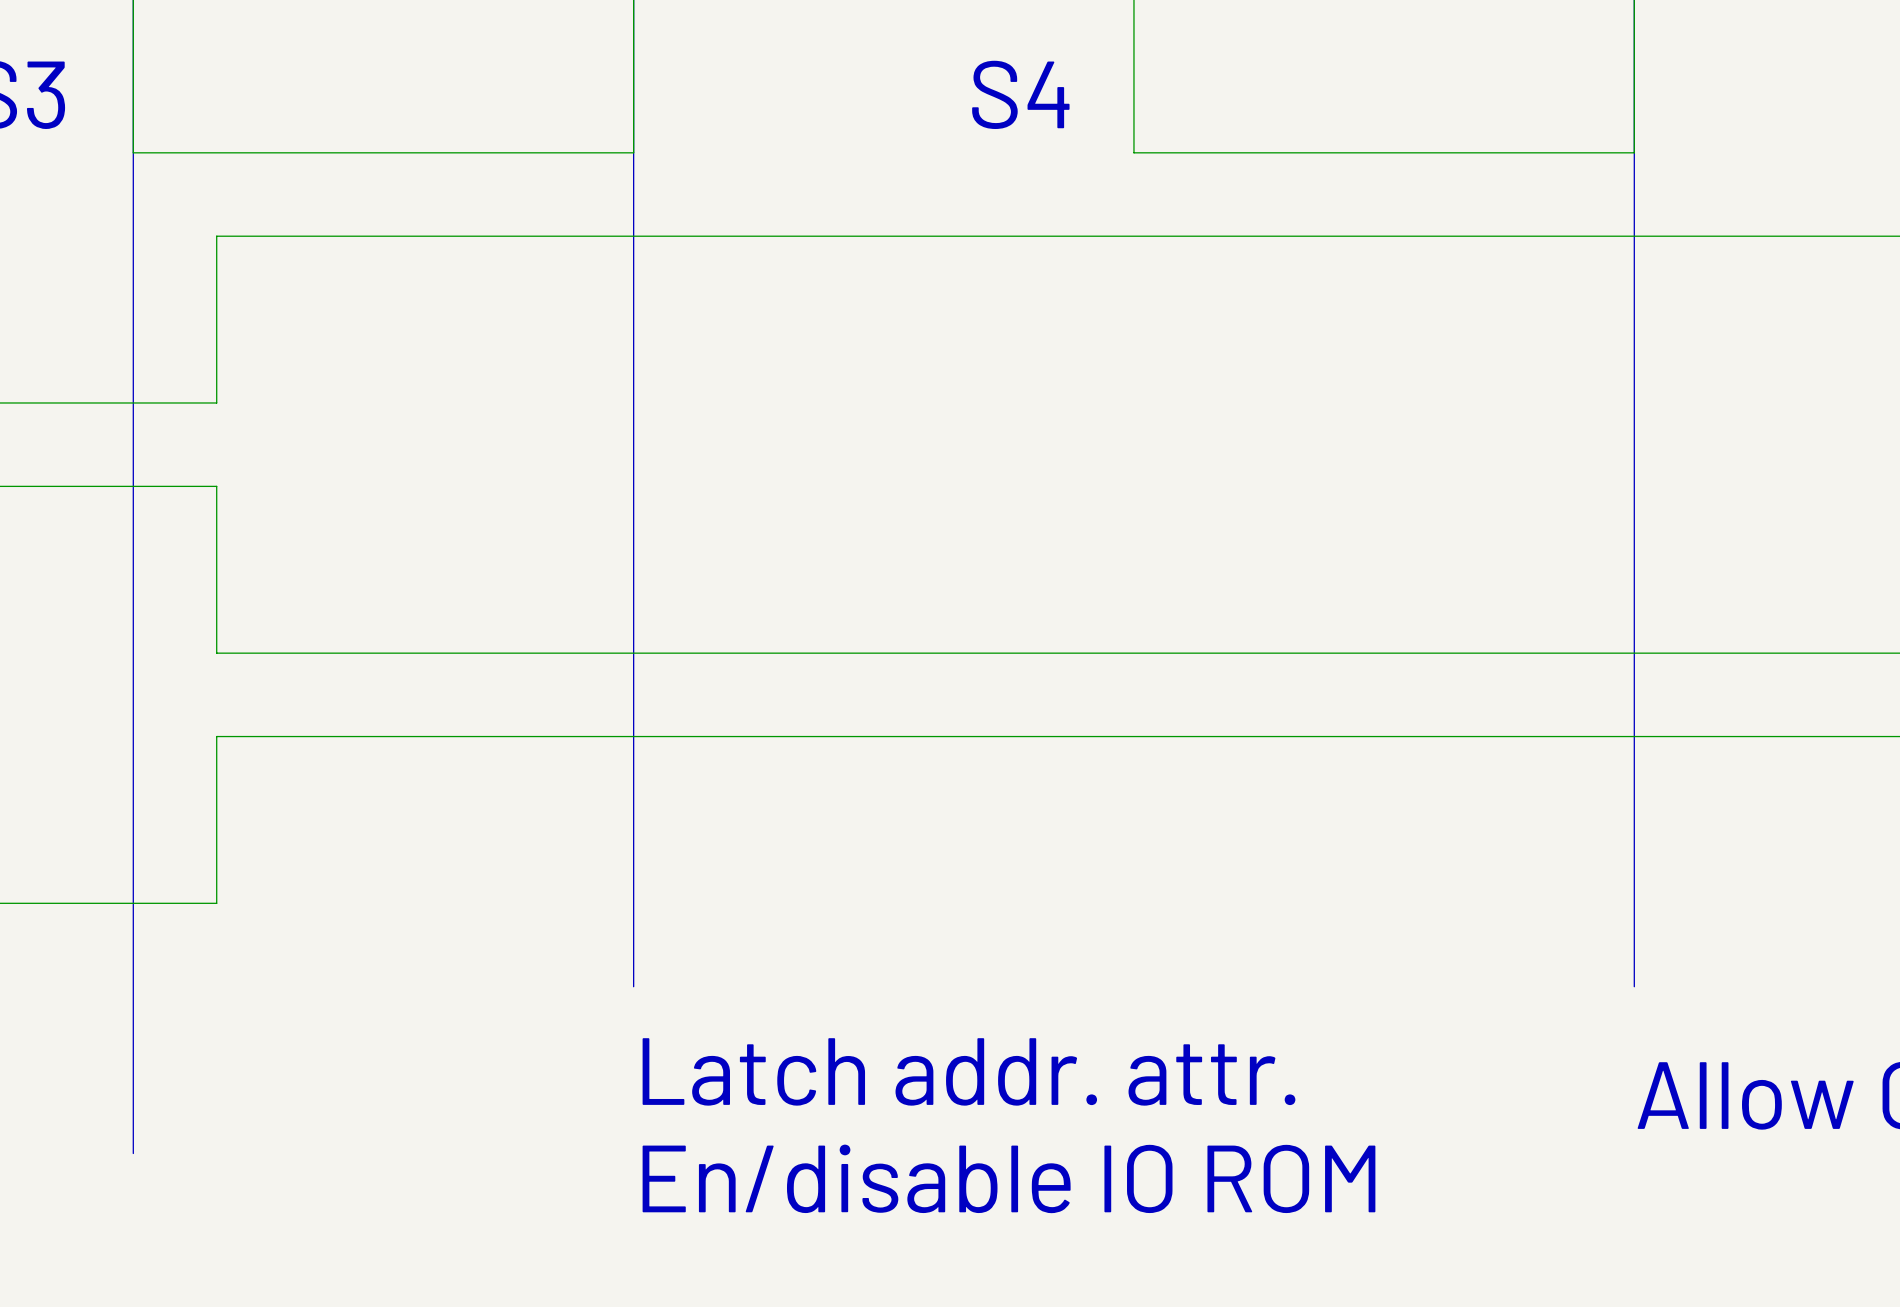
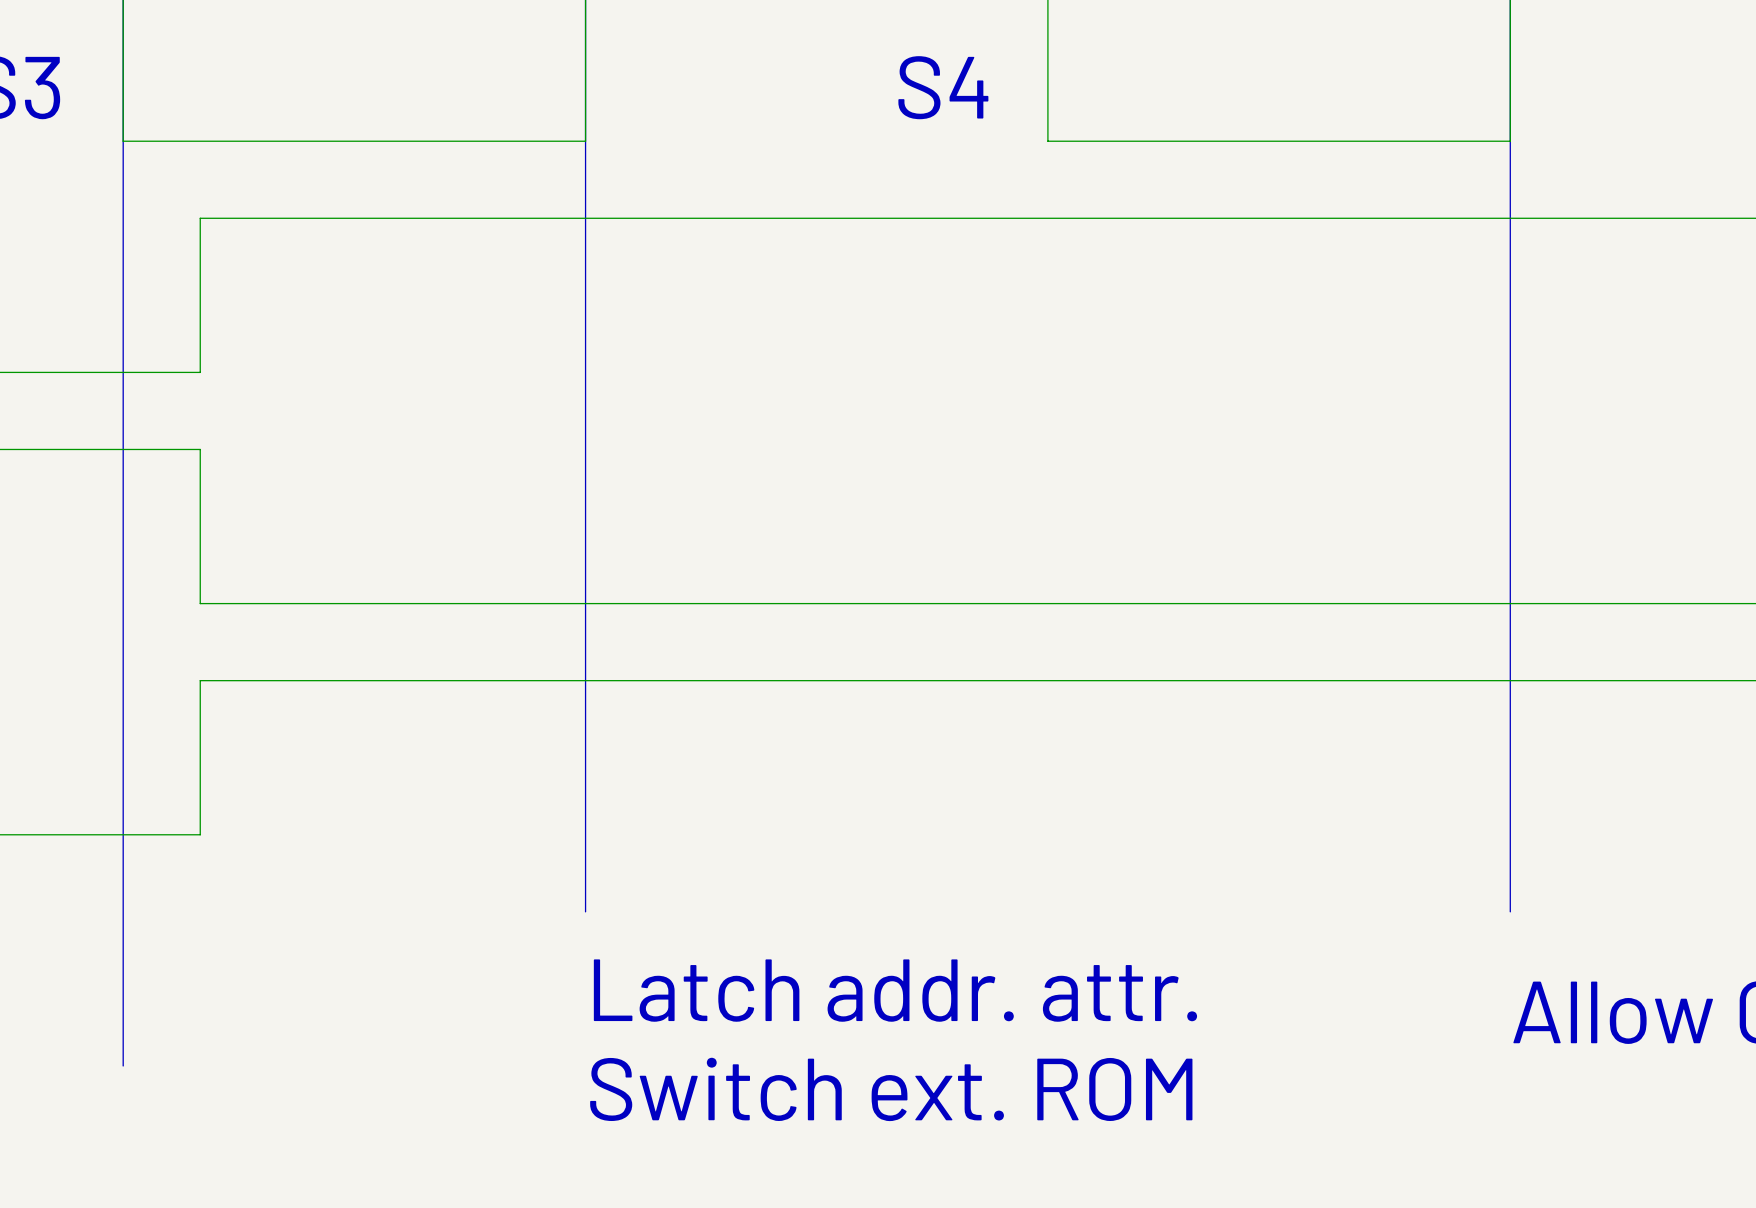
text: En/disable IO ROM (1008, 1178) -> Switch ext. ROM (891, 1089)

